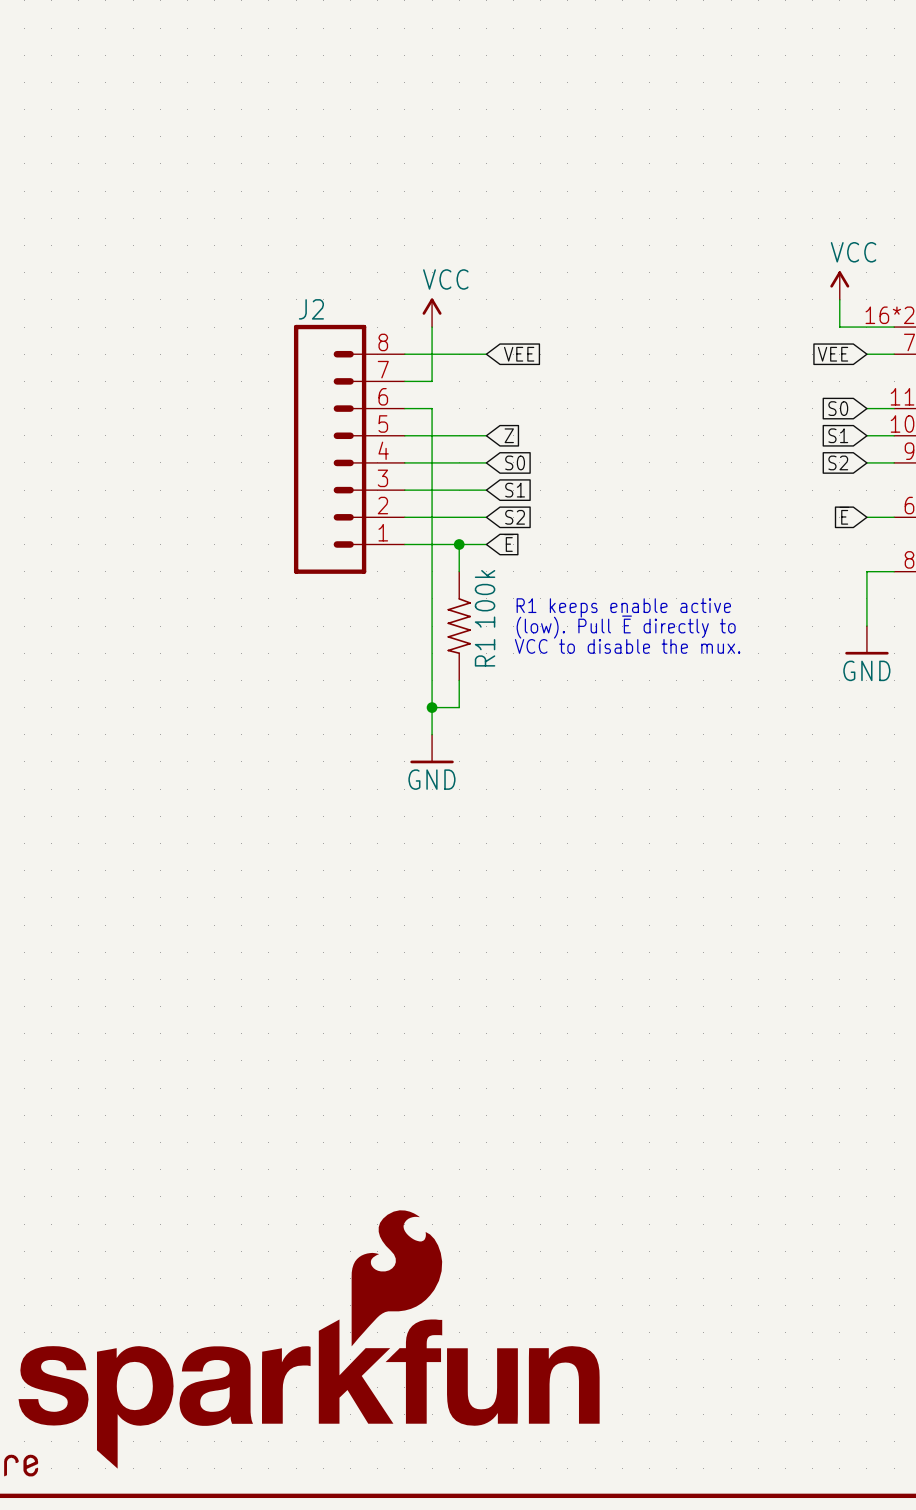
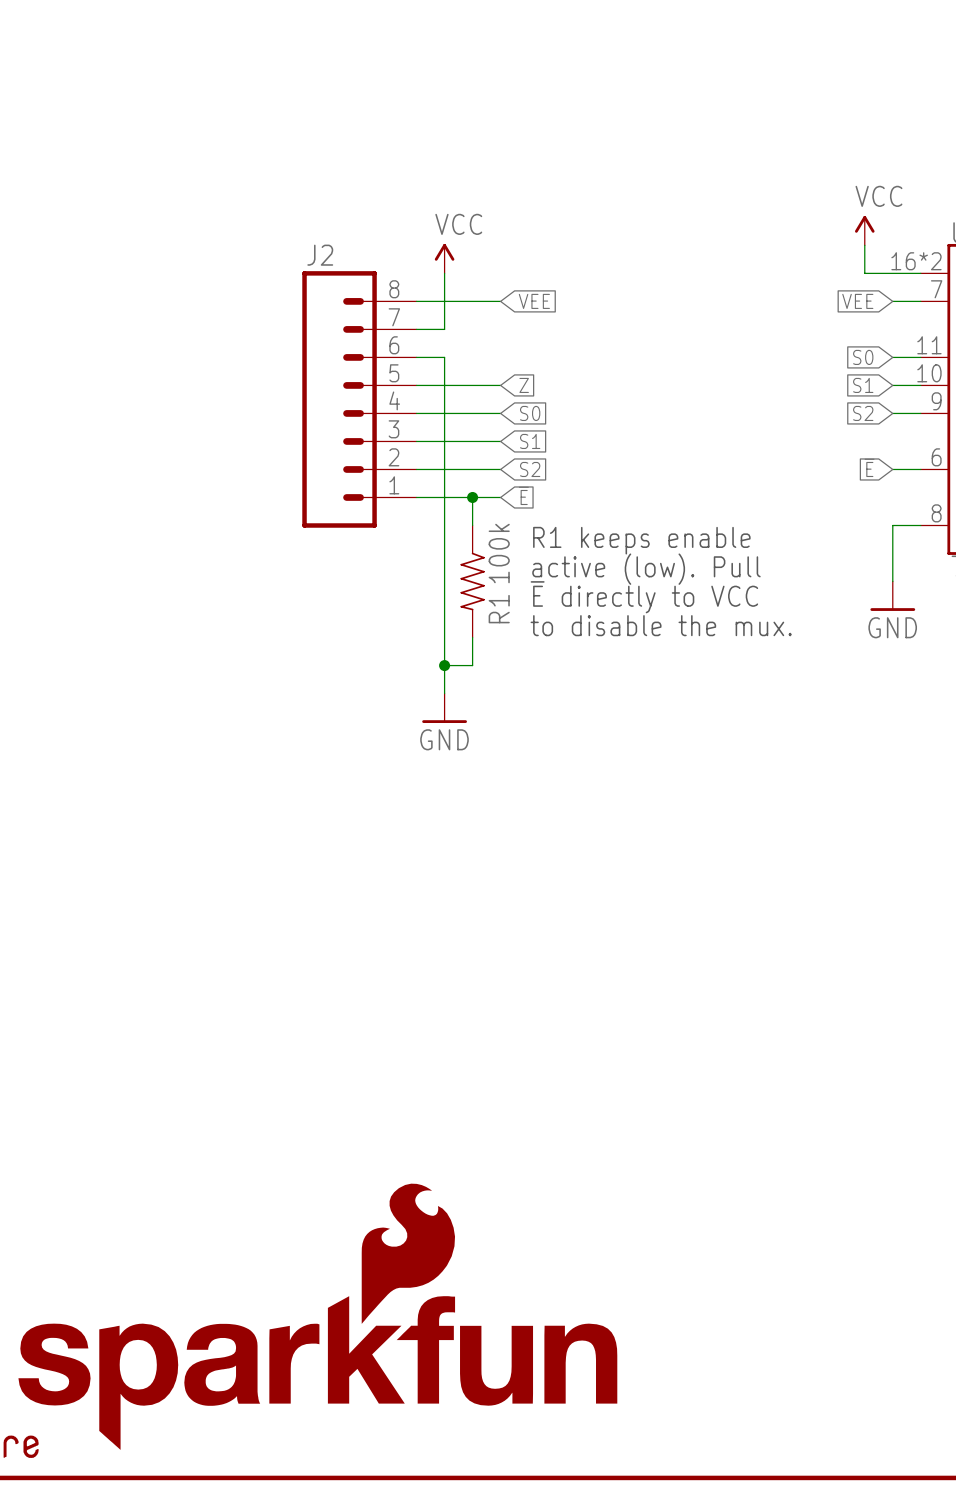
text: none -> R1 keeps enable (641, 540)
text: R1 keeps enable active (623, 607) -> active (low). Pull (646, 569)
text: (low). Pull ~{E} directly to (626, 627) -> none
text: VCC to disable the mux. (627, 646) -> ~{E} directly to VCC (644, 597)
text: none -> to disable the mux. (661, 625)

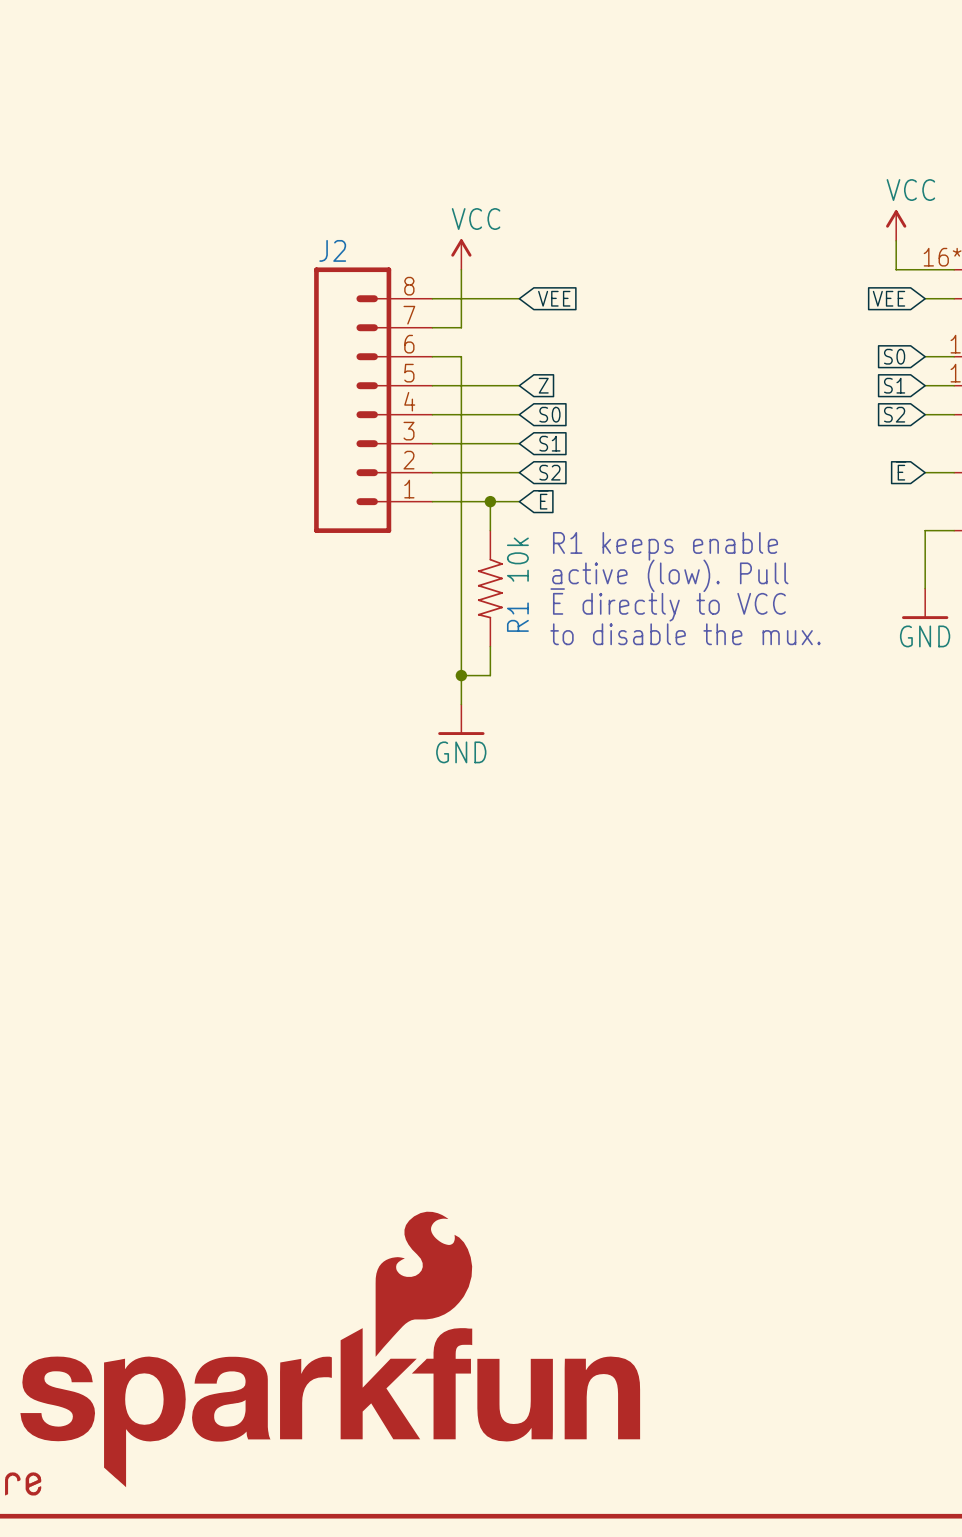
R1 value: 100k (499, 553) -> 10k (517, 559)

